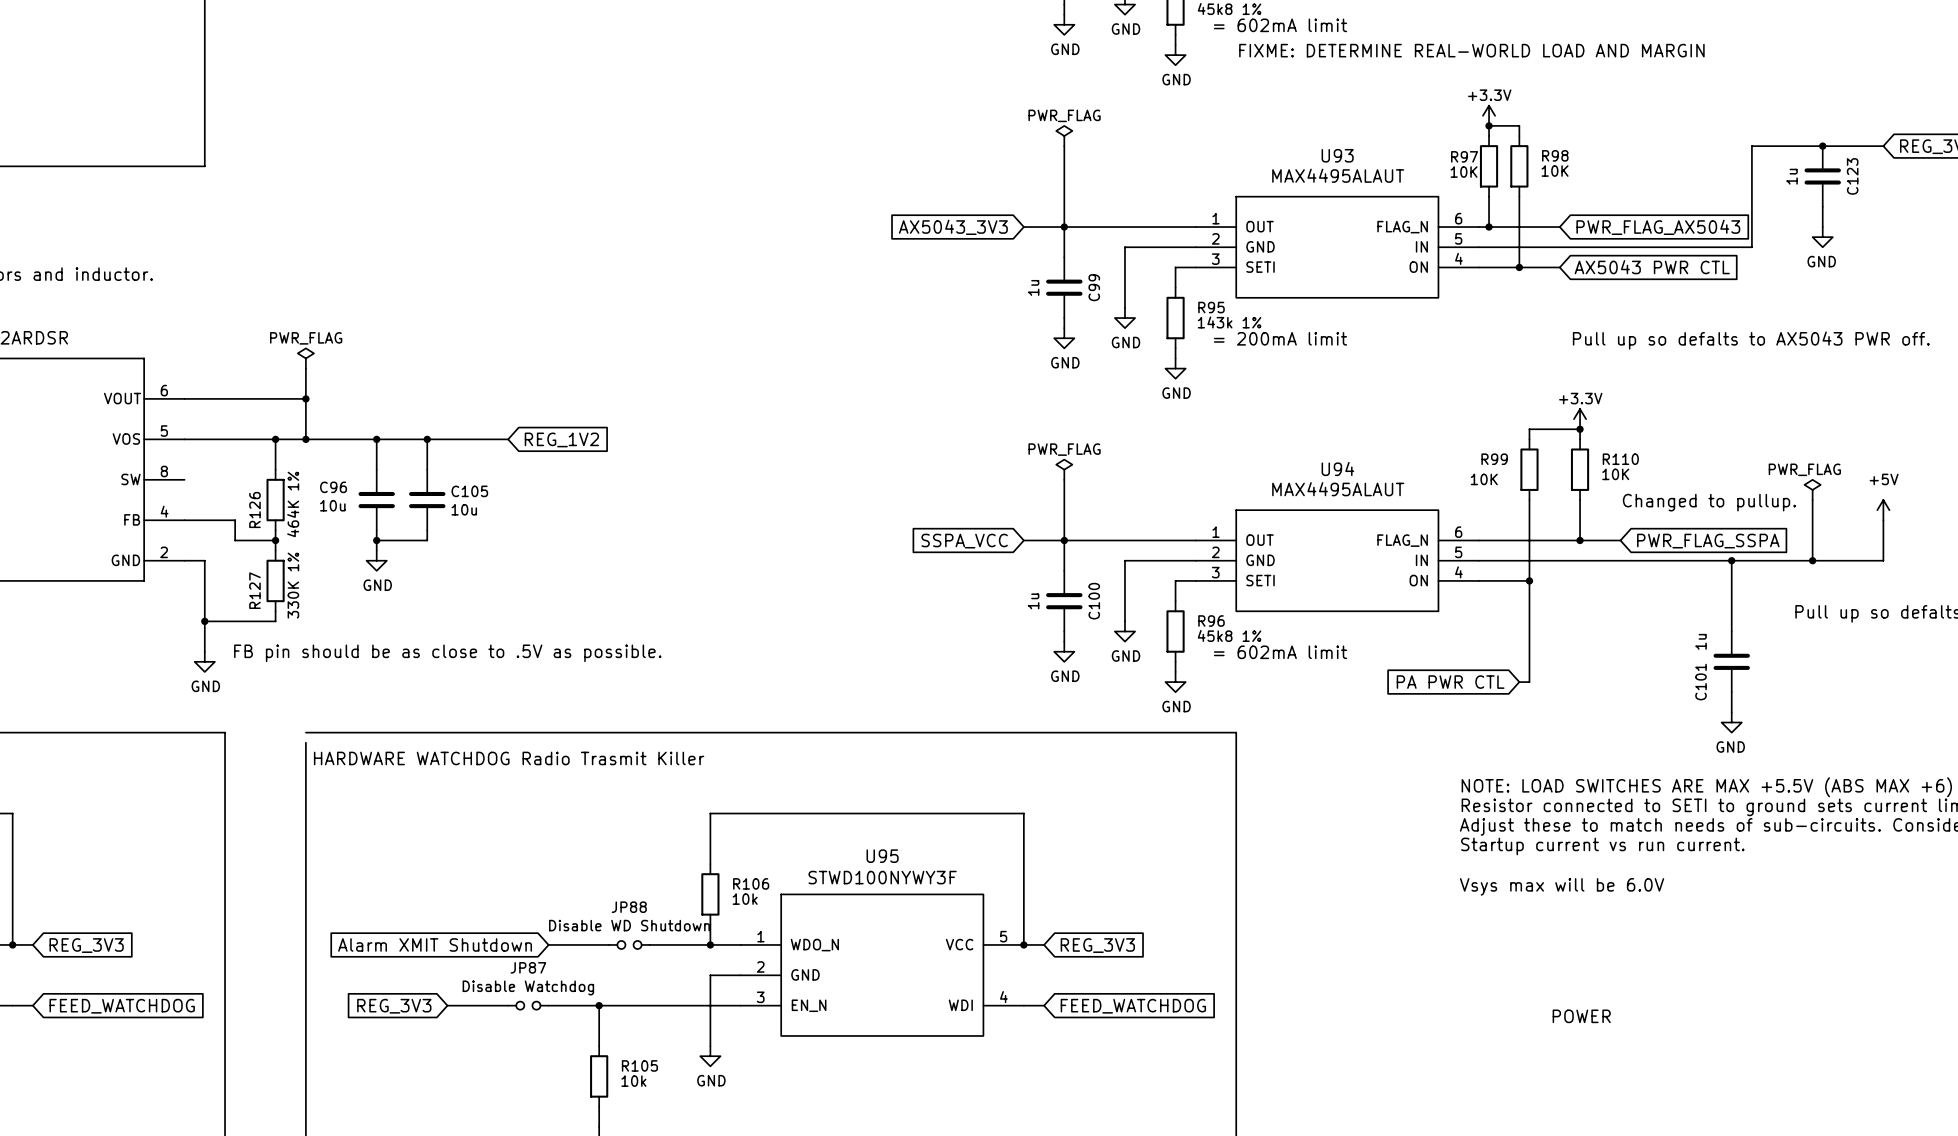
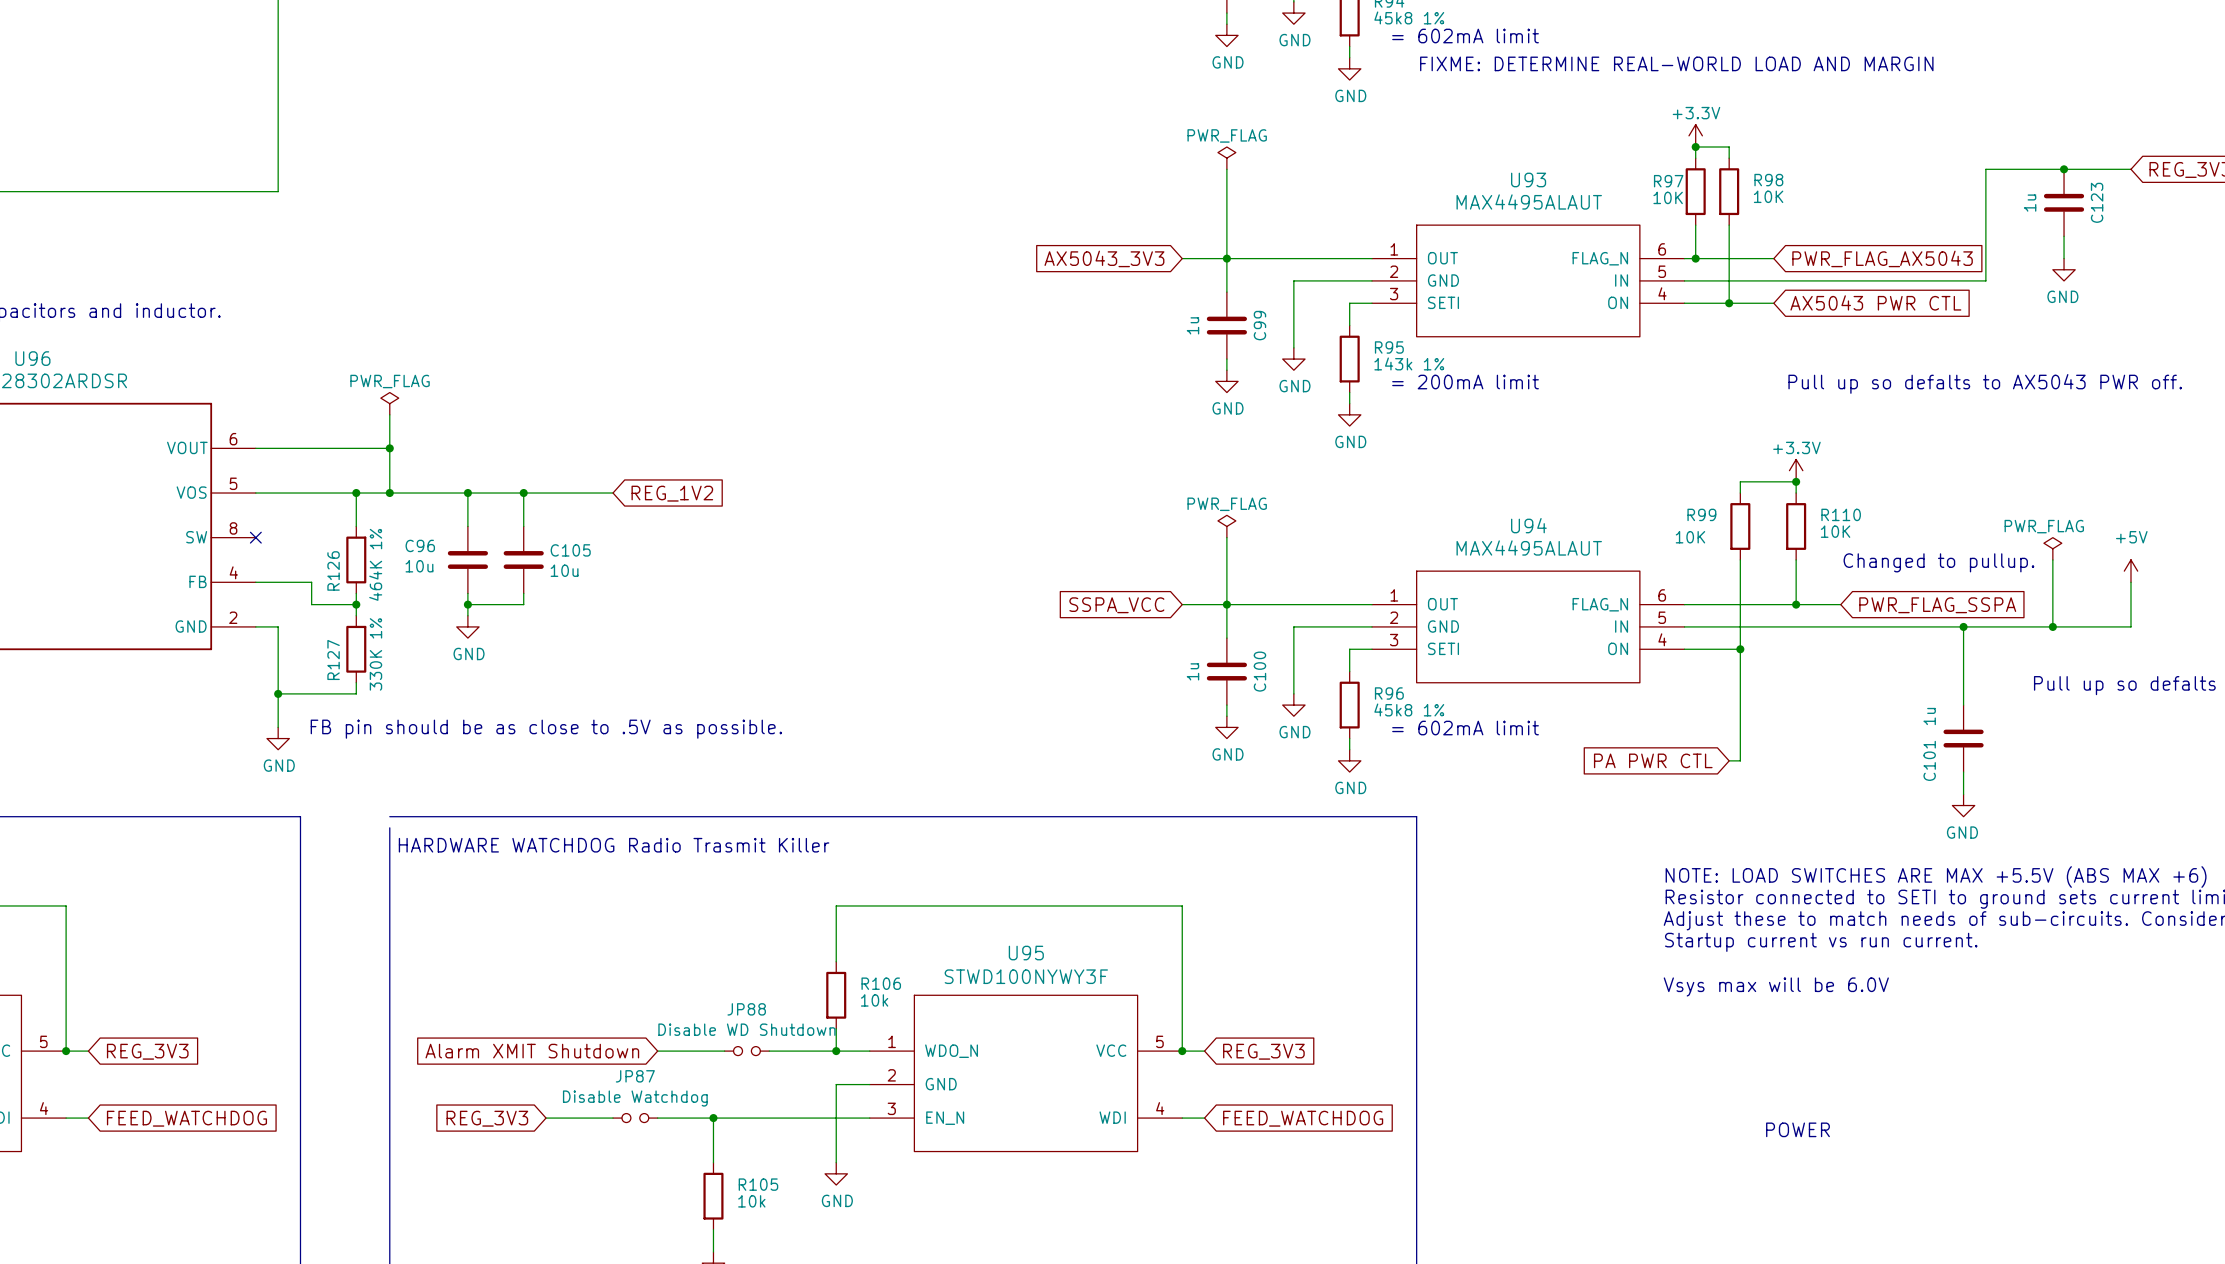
no-connect mark: none -> (255, 537)

